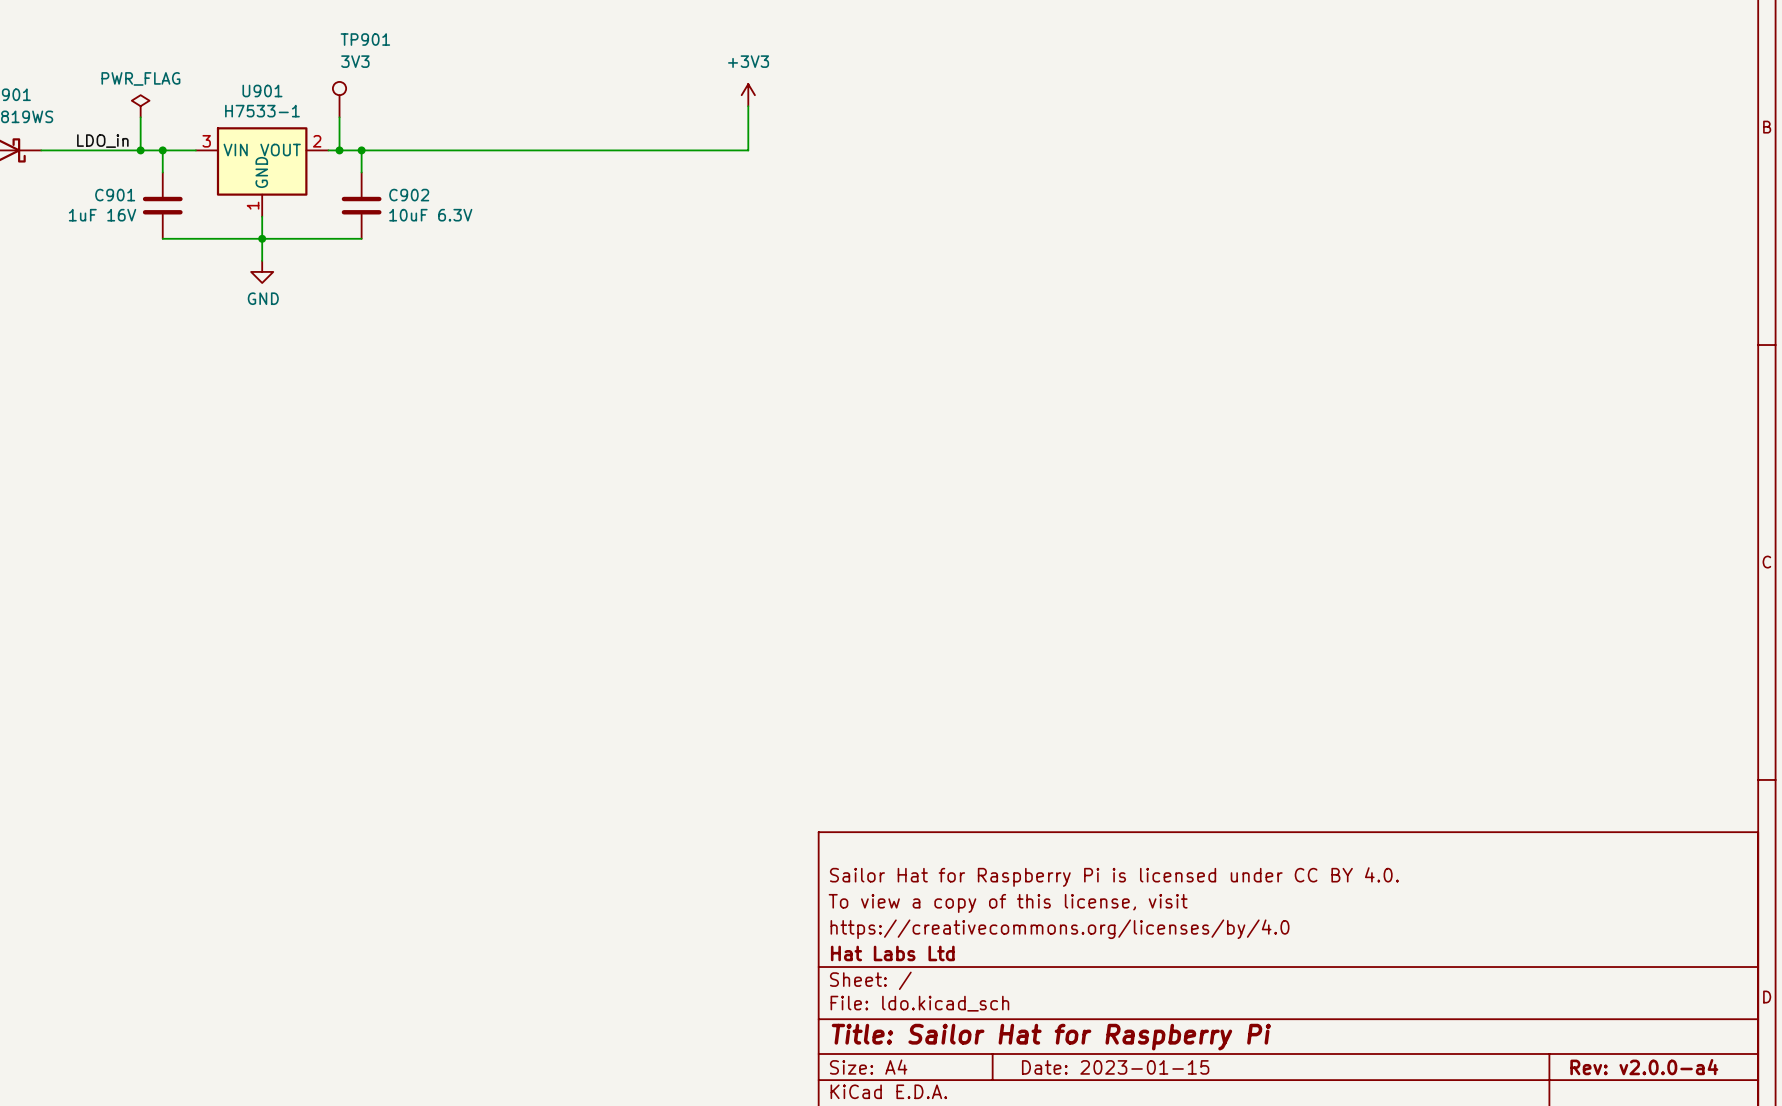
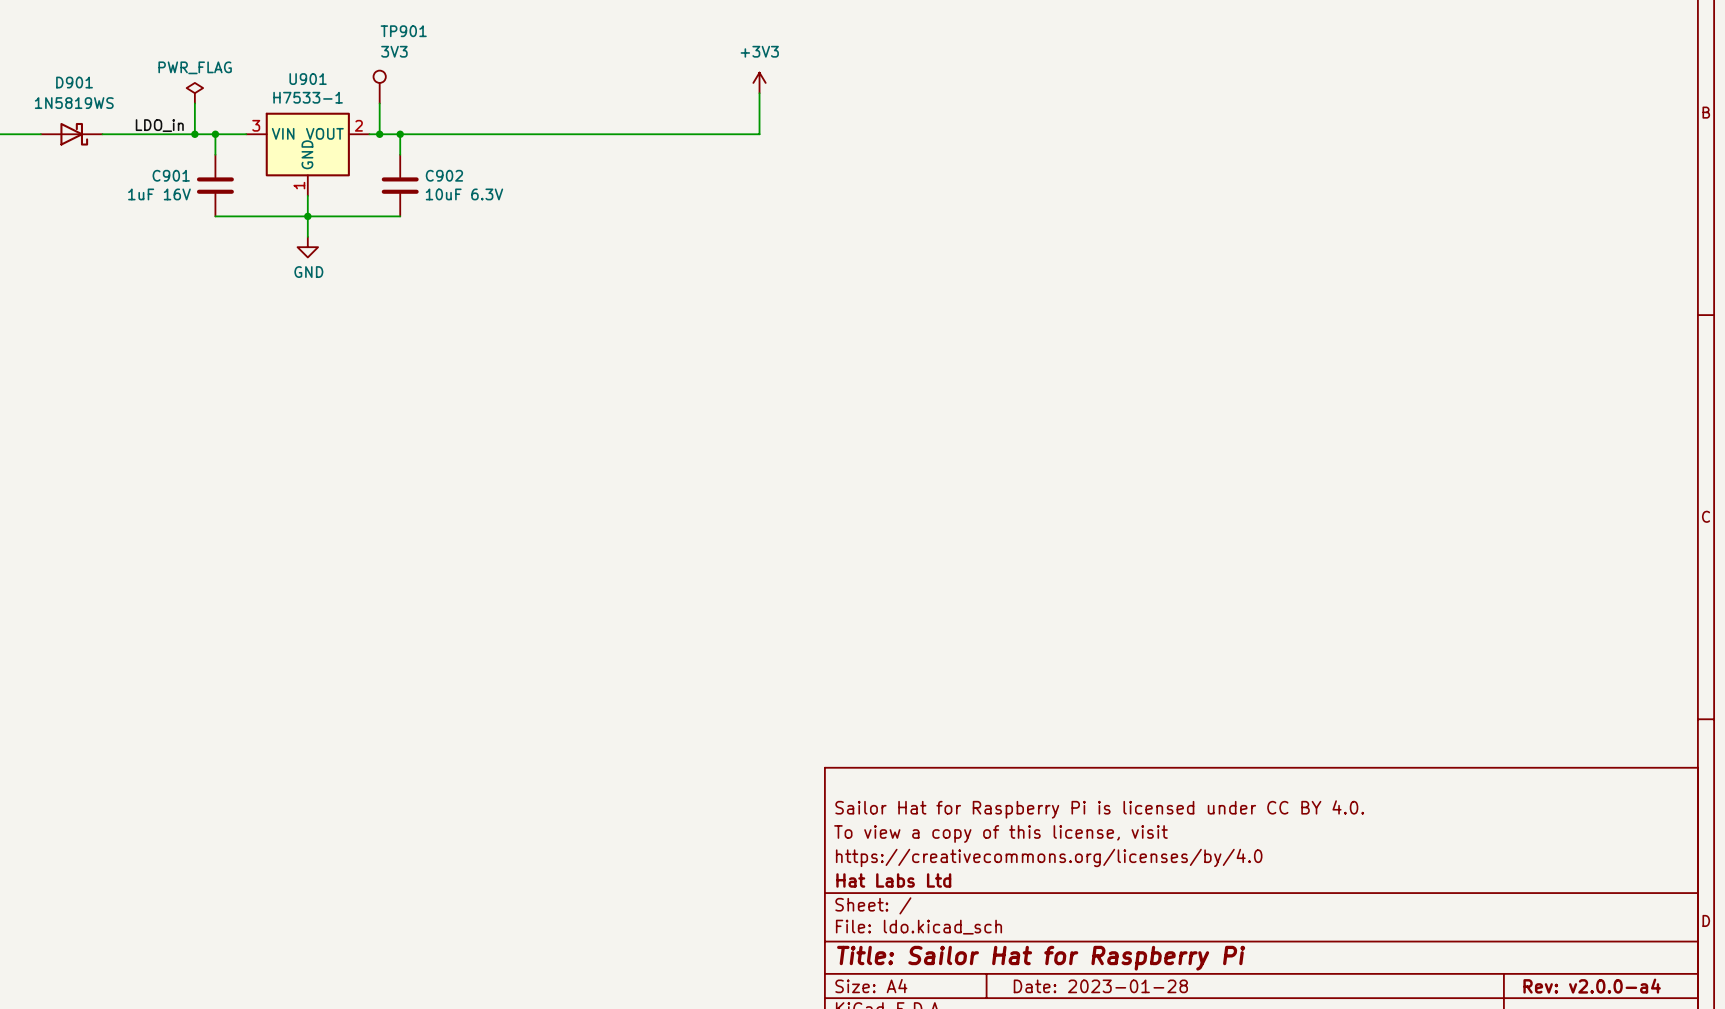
title block: Date: 2023-01-15 (1115, 1067) -> Date: 2023-01-28 (1100, 986)

